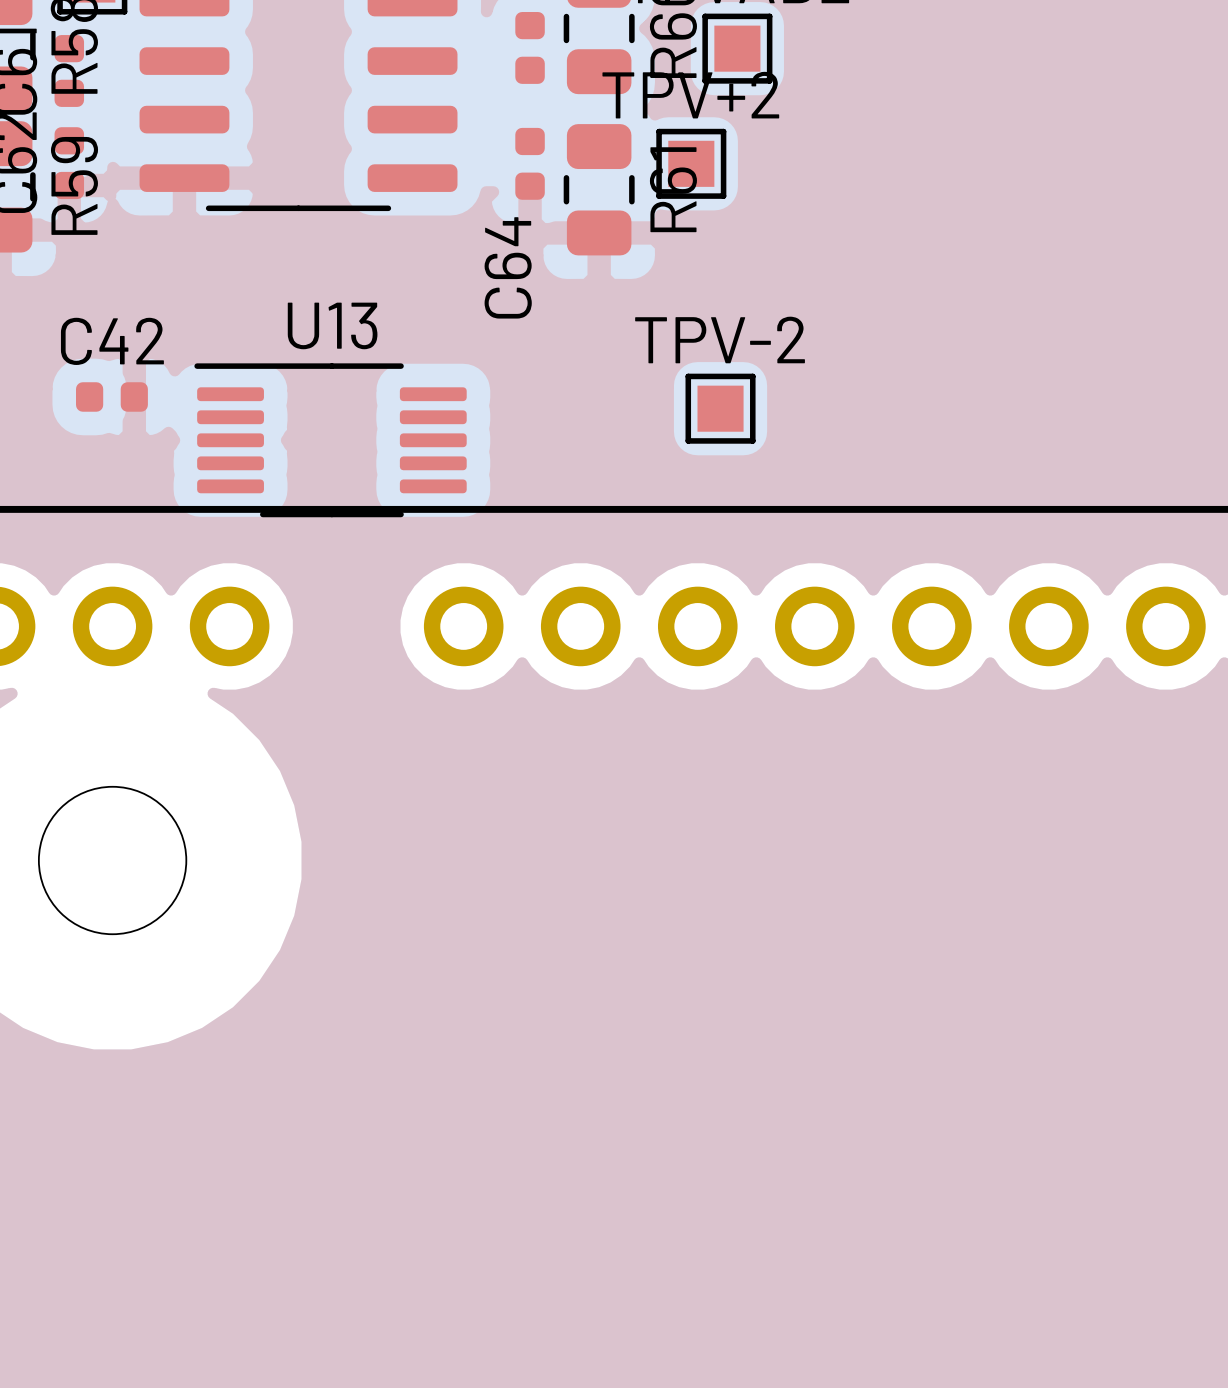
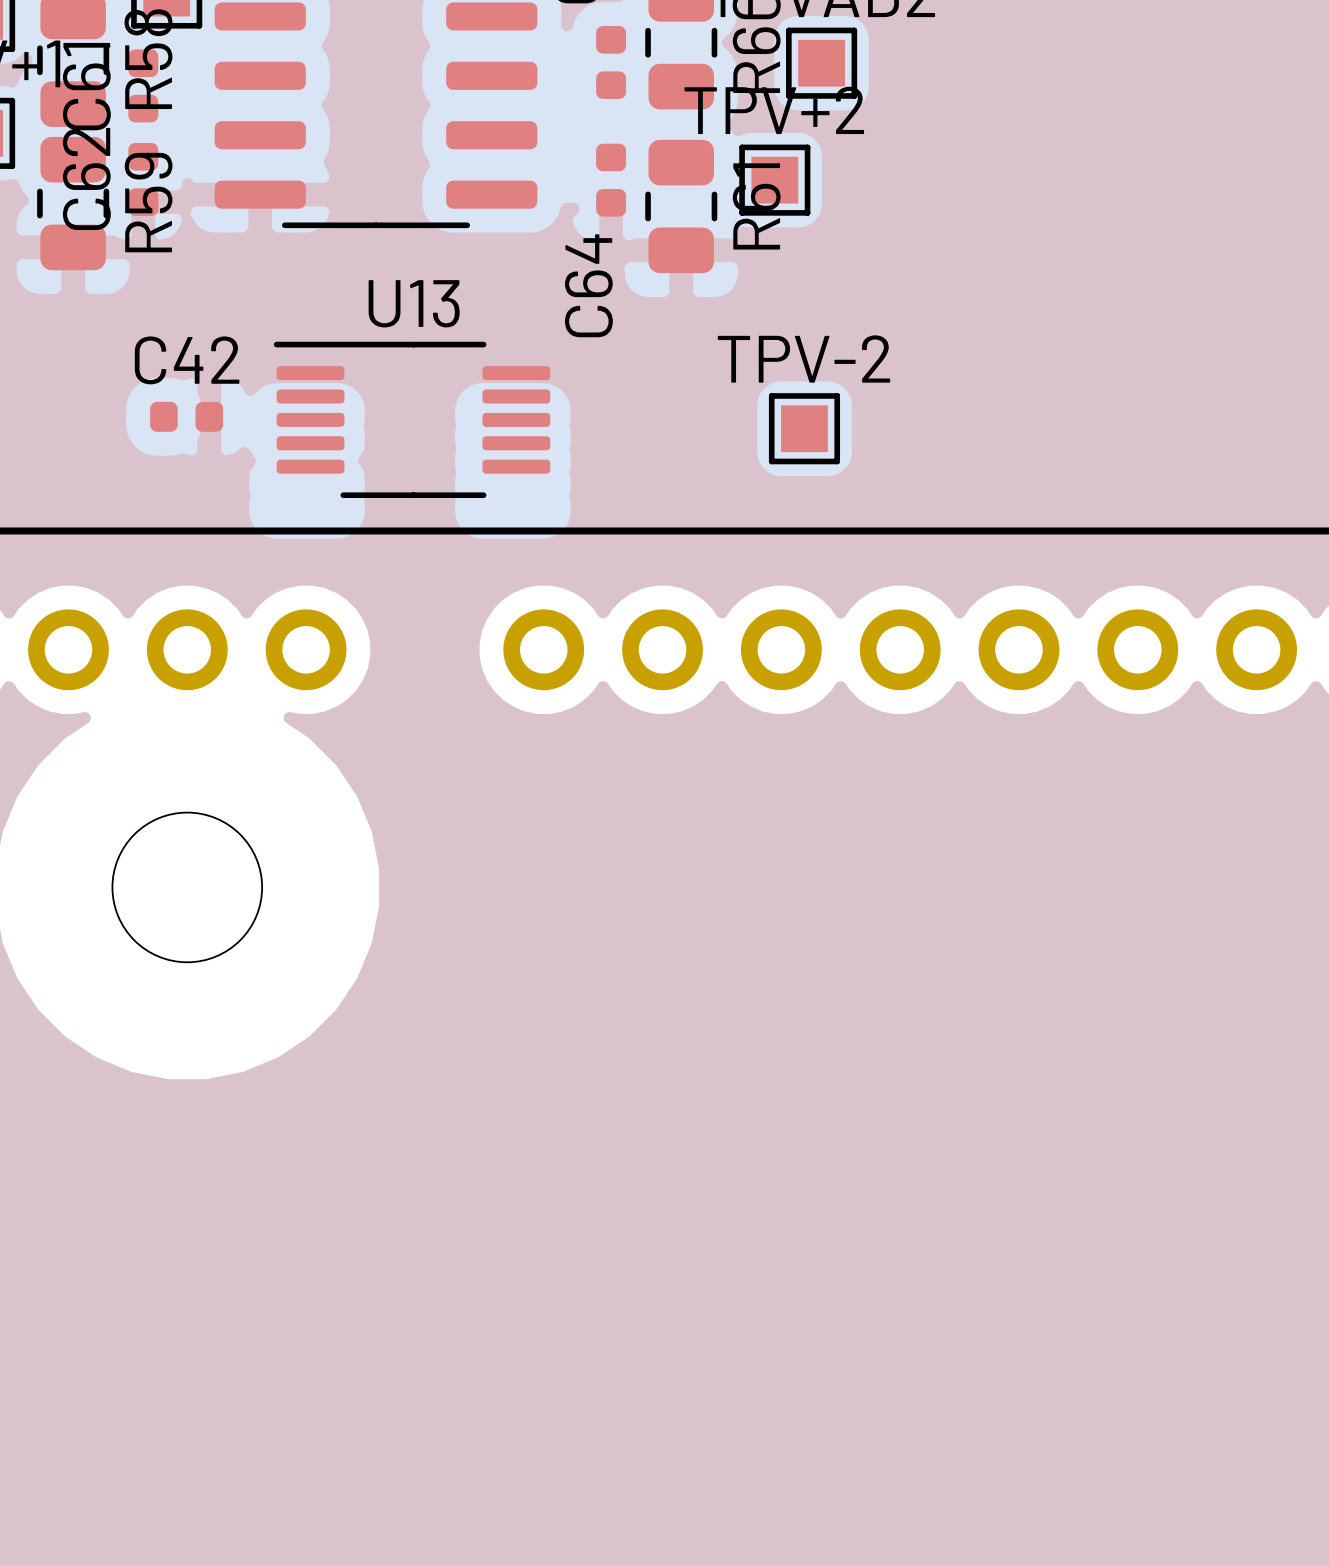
U13 position: (330, 440) -> (412, 419)

